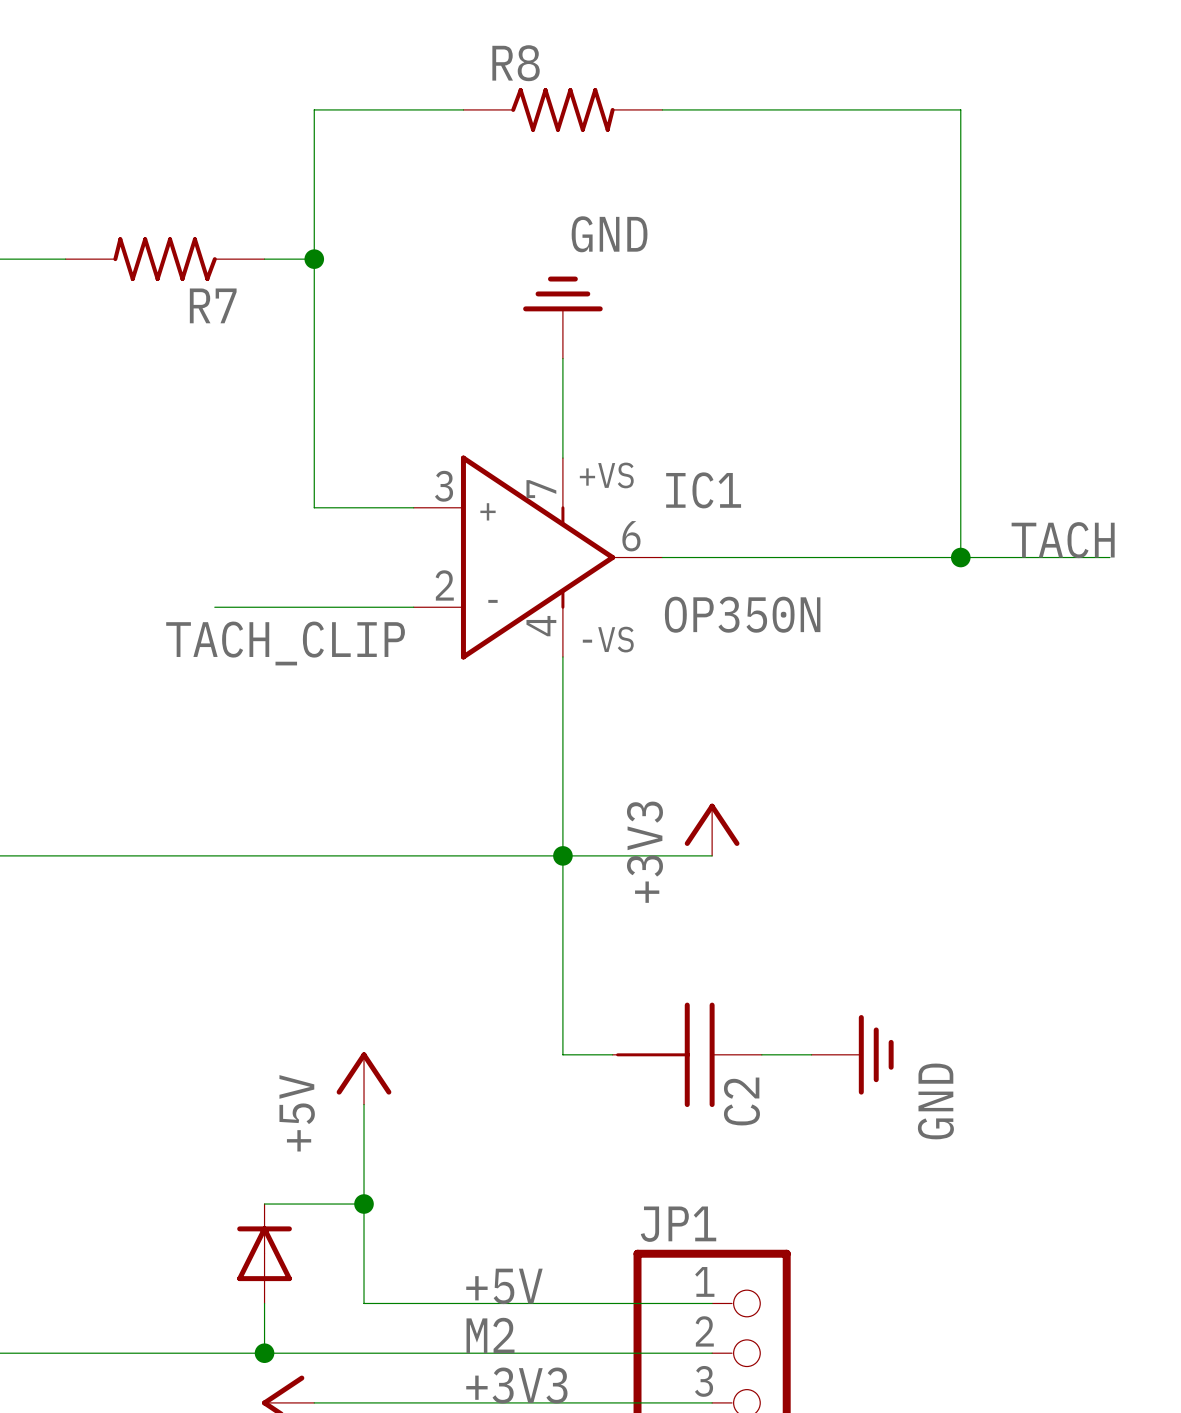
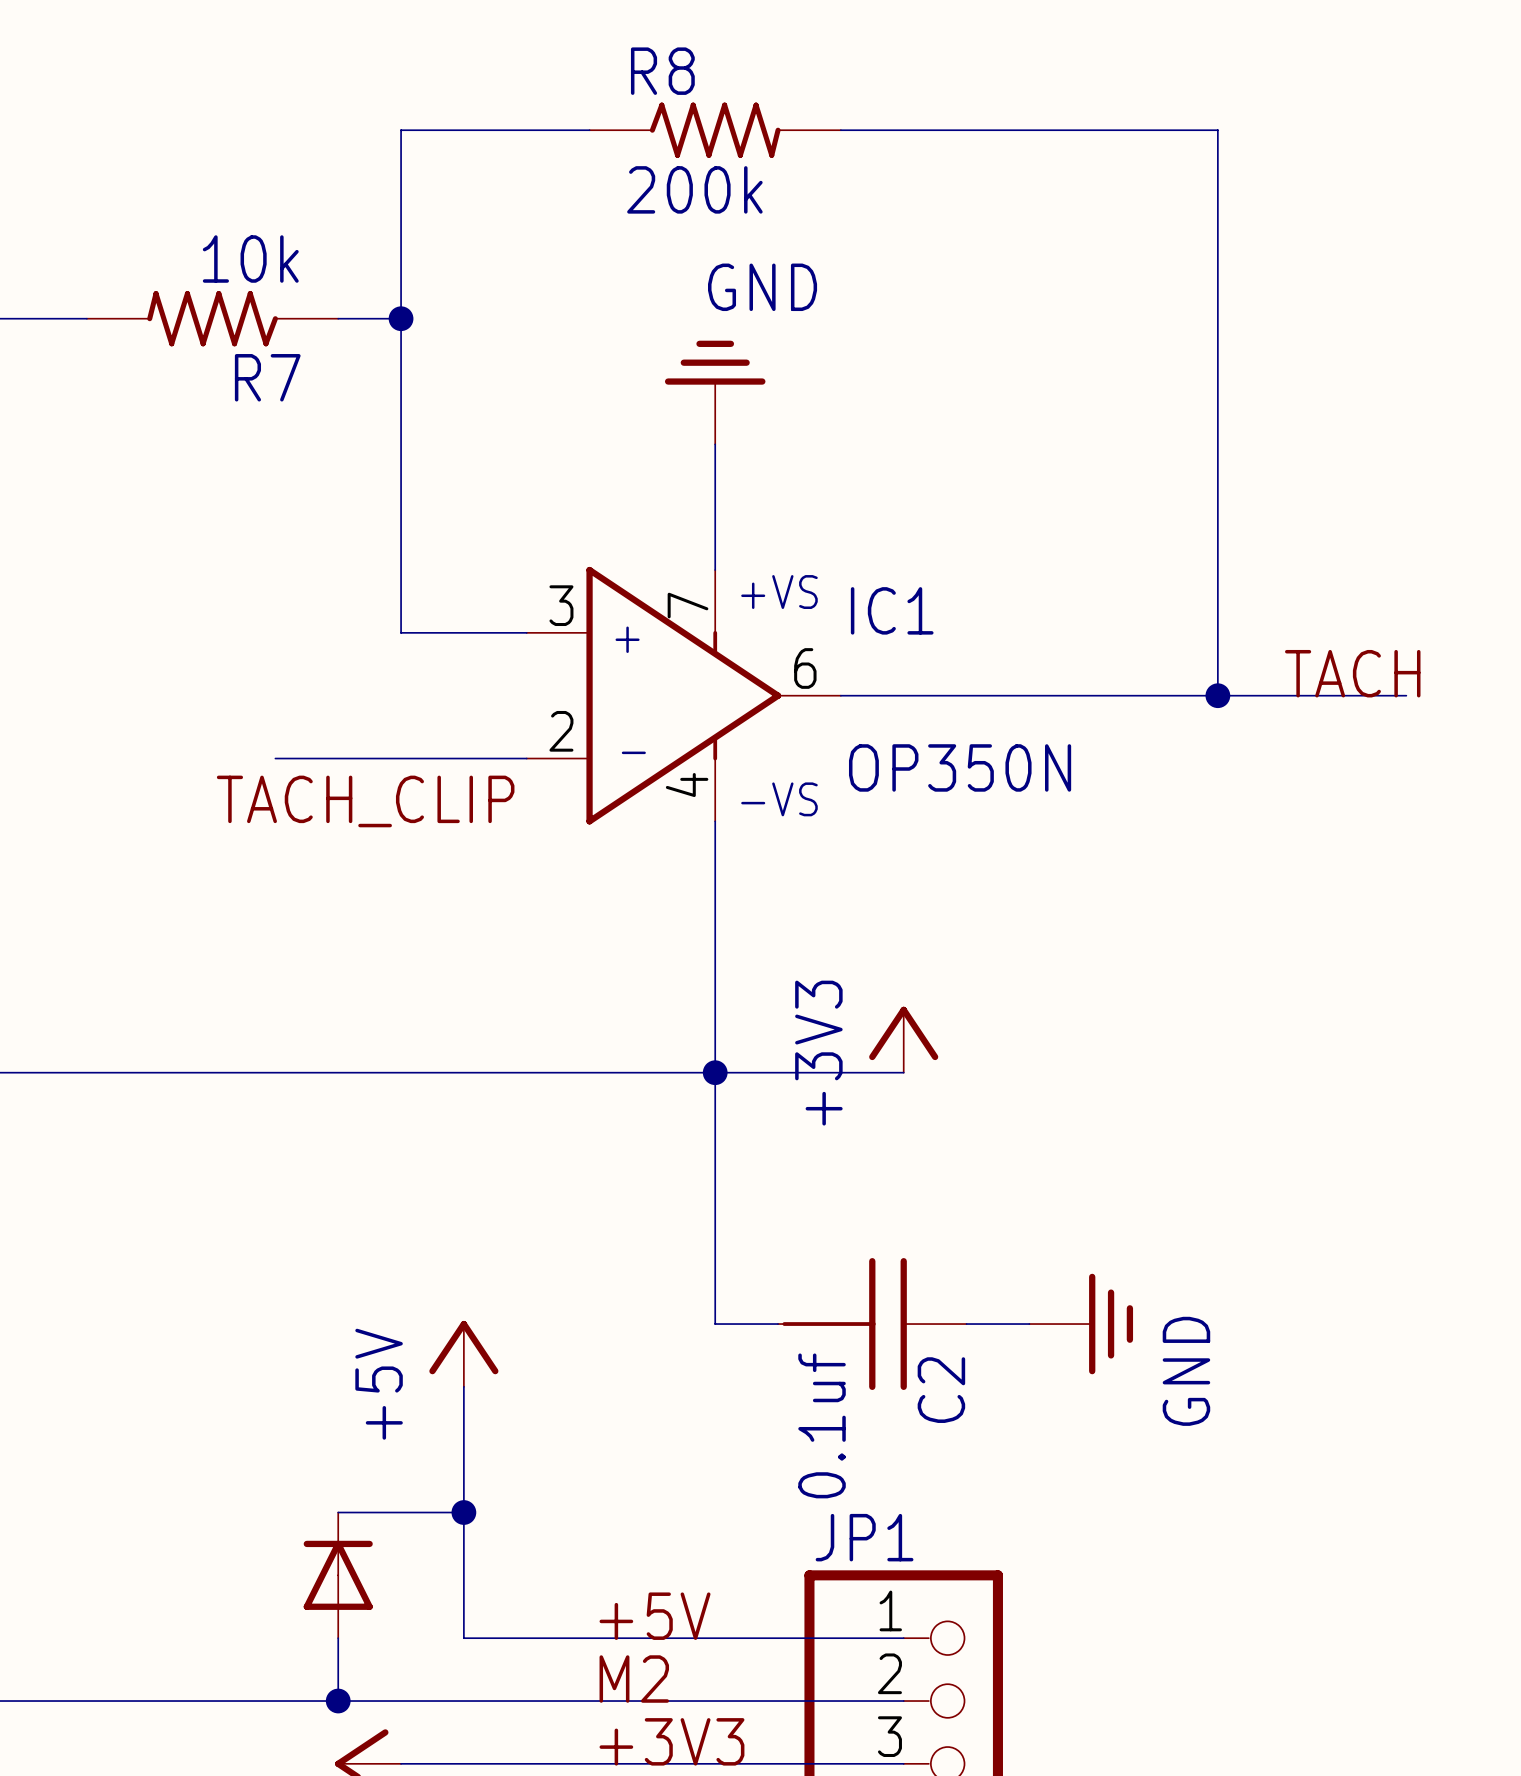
R8 value: none -> 200k (694, 189)
R7 value: none -> 10k (250, 259)
C2 value: none -> 0.1uf (822, 1425)

